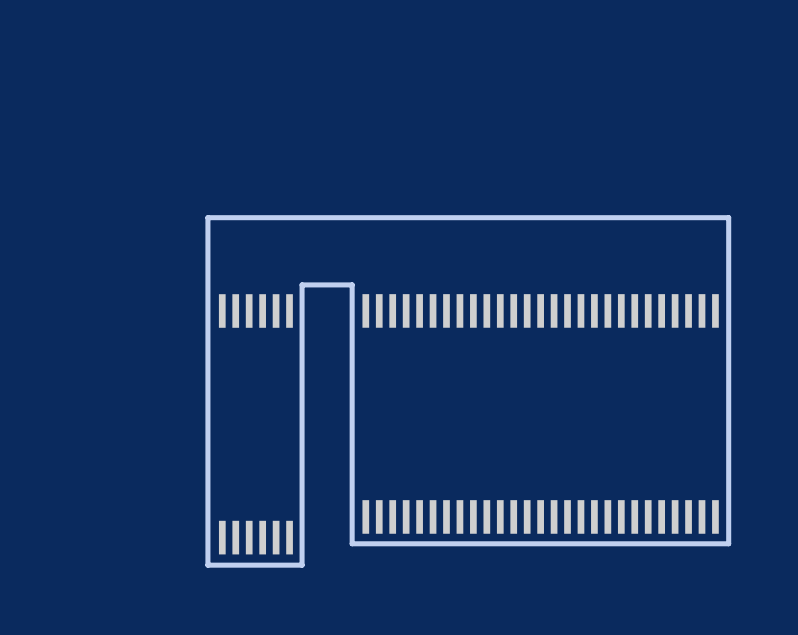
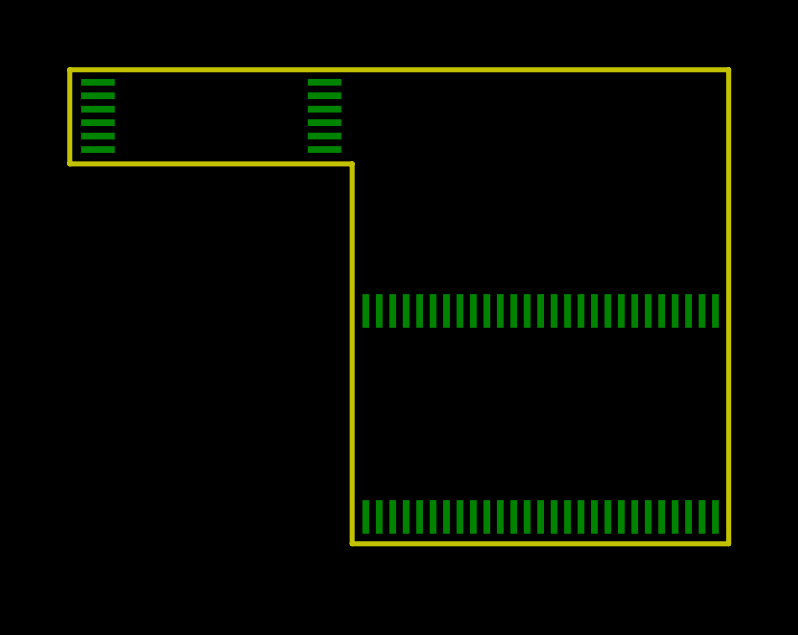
part: none -> (97, 115)
part: none -> (324, 115)
board edge: (728, 217) (207, 217) (207, 565) (302, 565) (302, 284) (352, 284) -> (728, 217) (728, 69) (69, 69) (69, 163) (352, 163) (352, 284)
part: (255, 310) -> none
part: (255, 537) -> none

